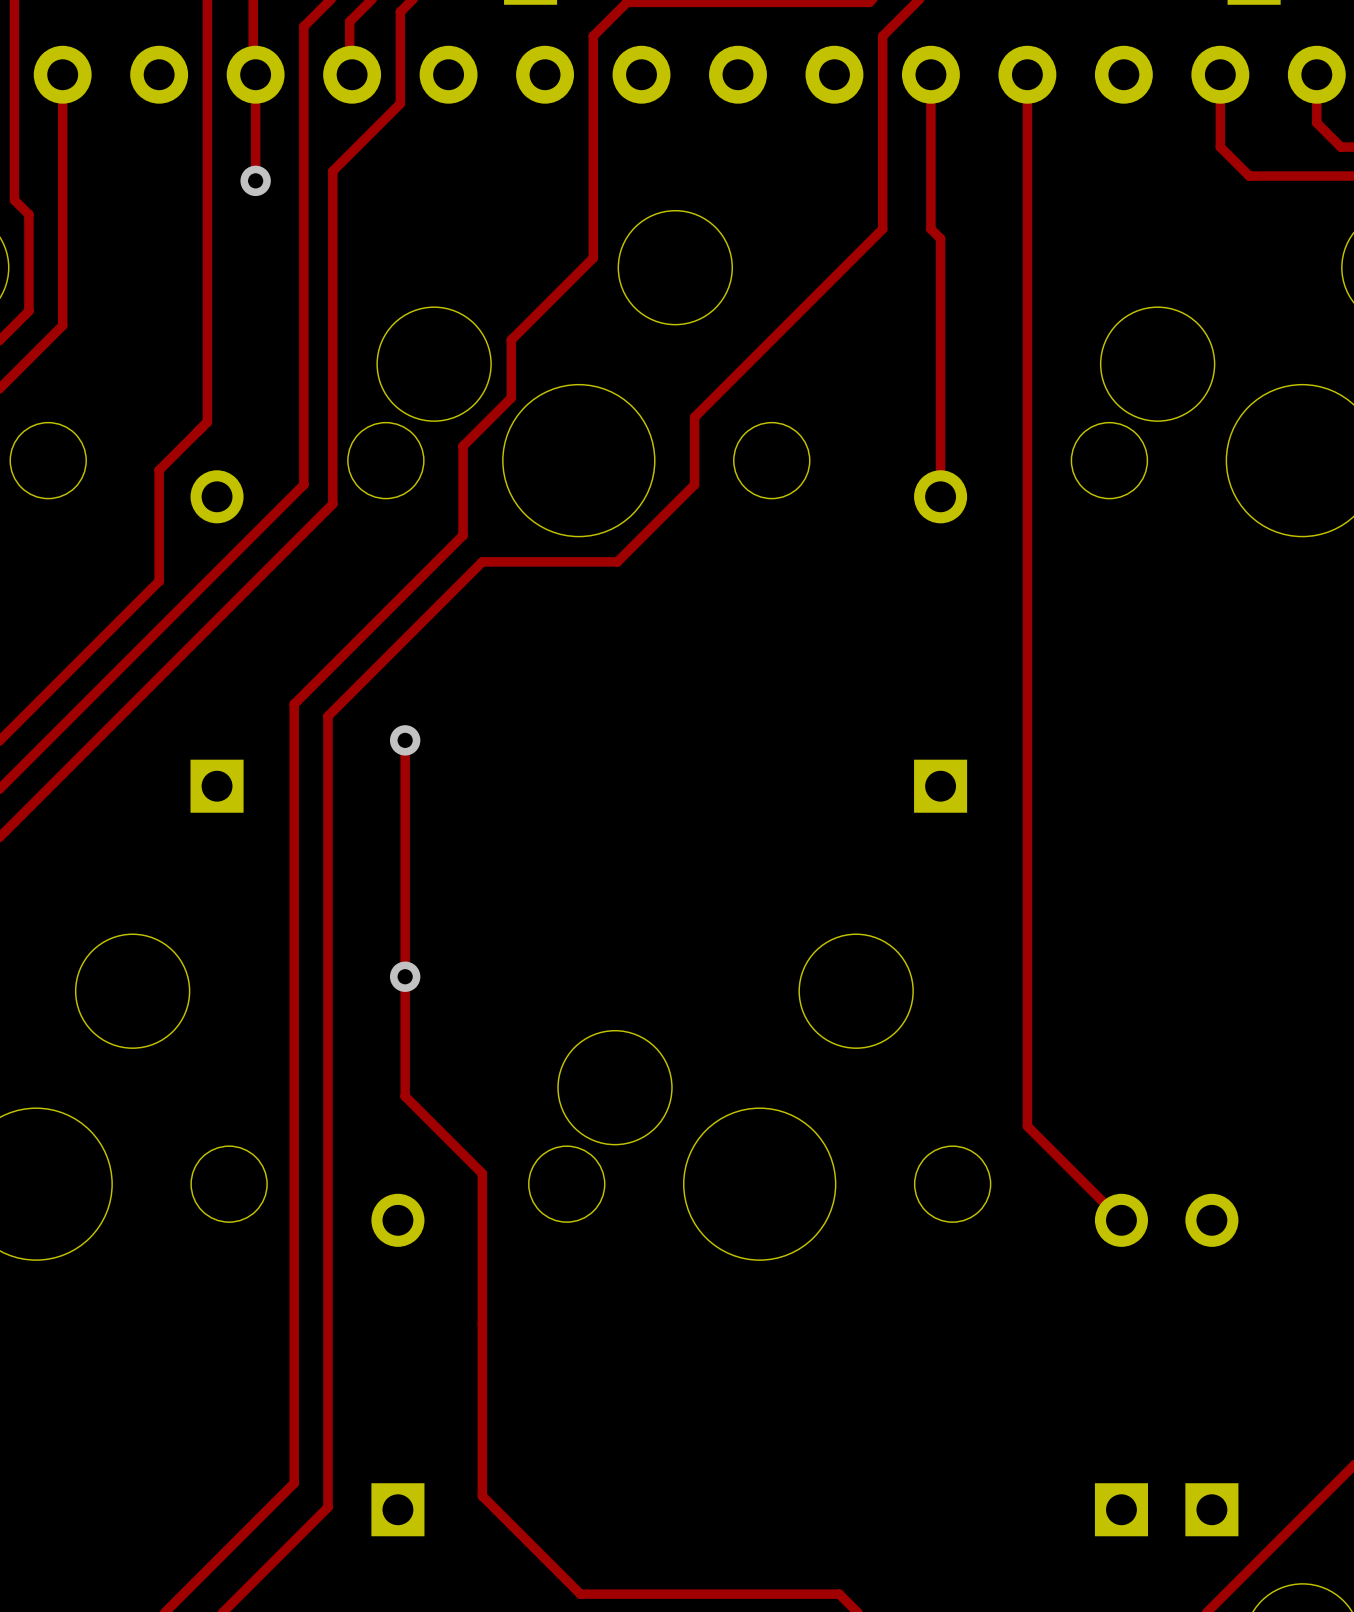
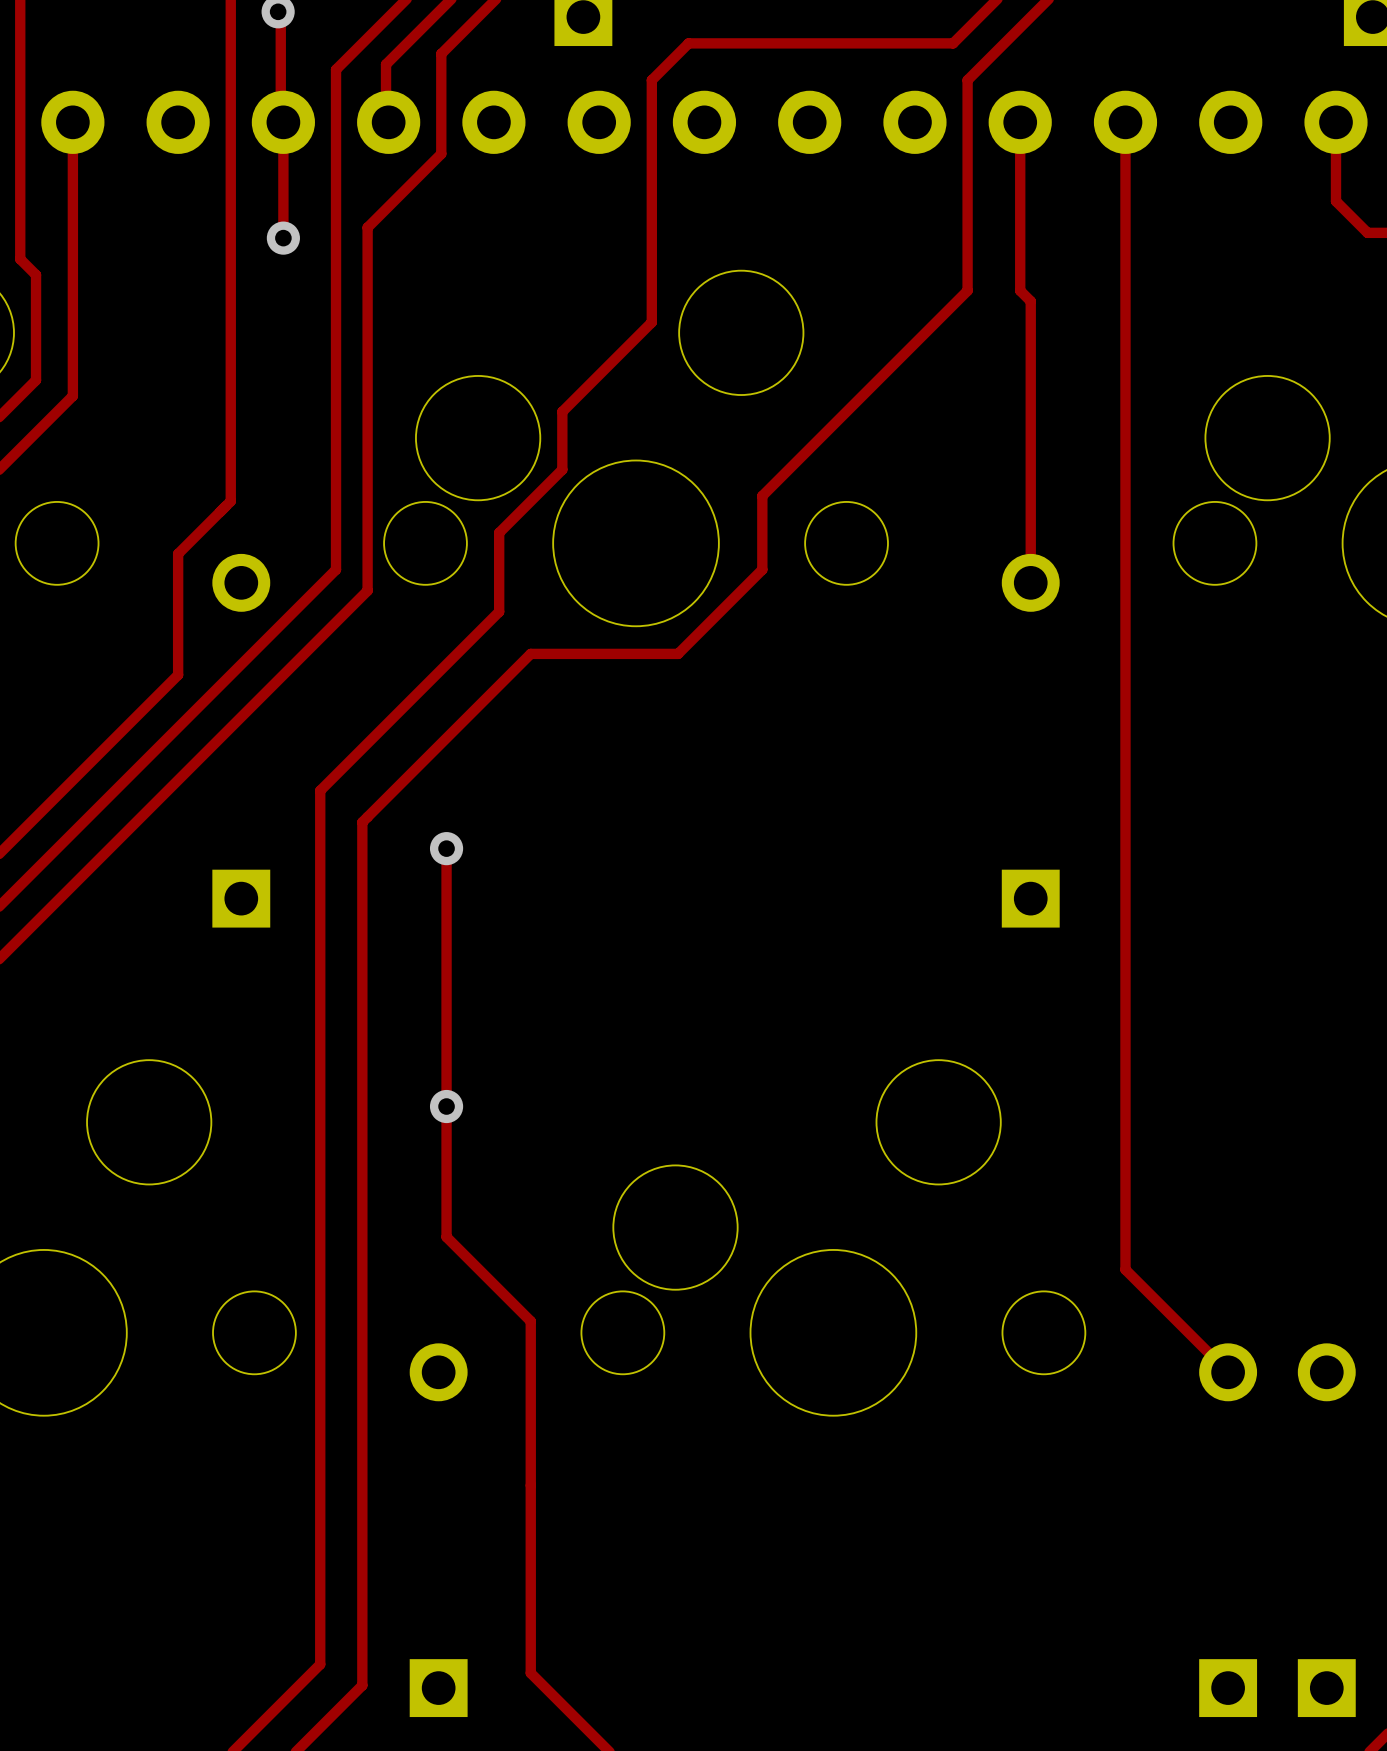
track: (511, 393) (511, 397) (463, 446) (463, 535) (294, 704) (294, 1483) (289, 1488) -> (562, 469) (499, 532) (499, 611) (320, 790) (320, 1664)

